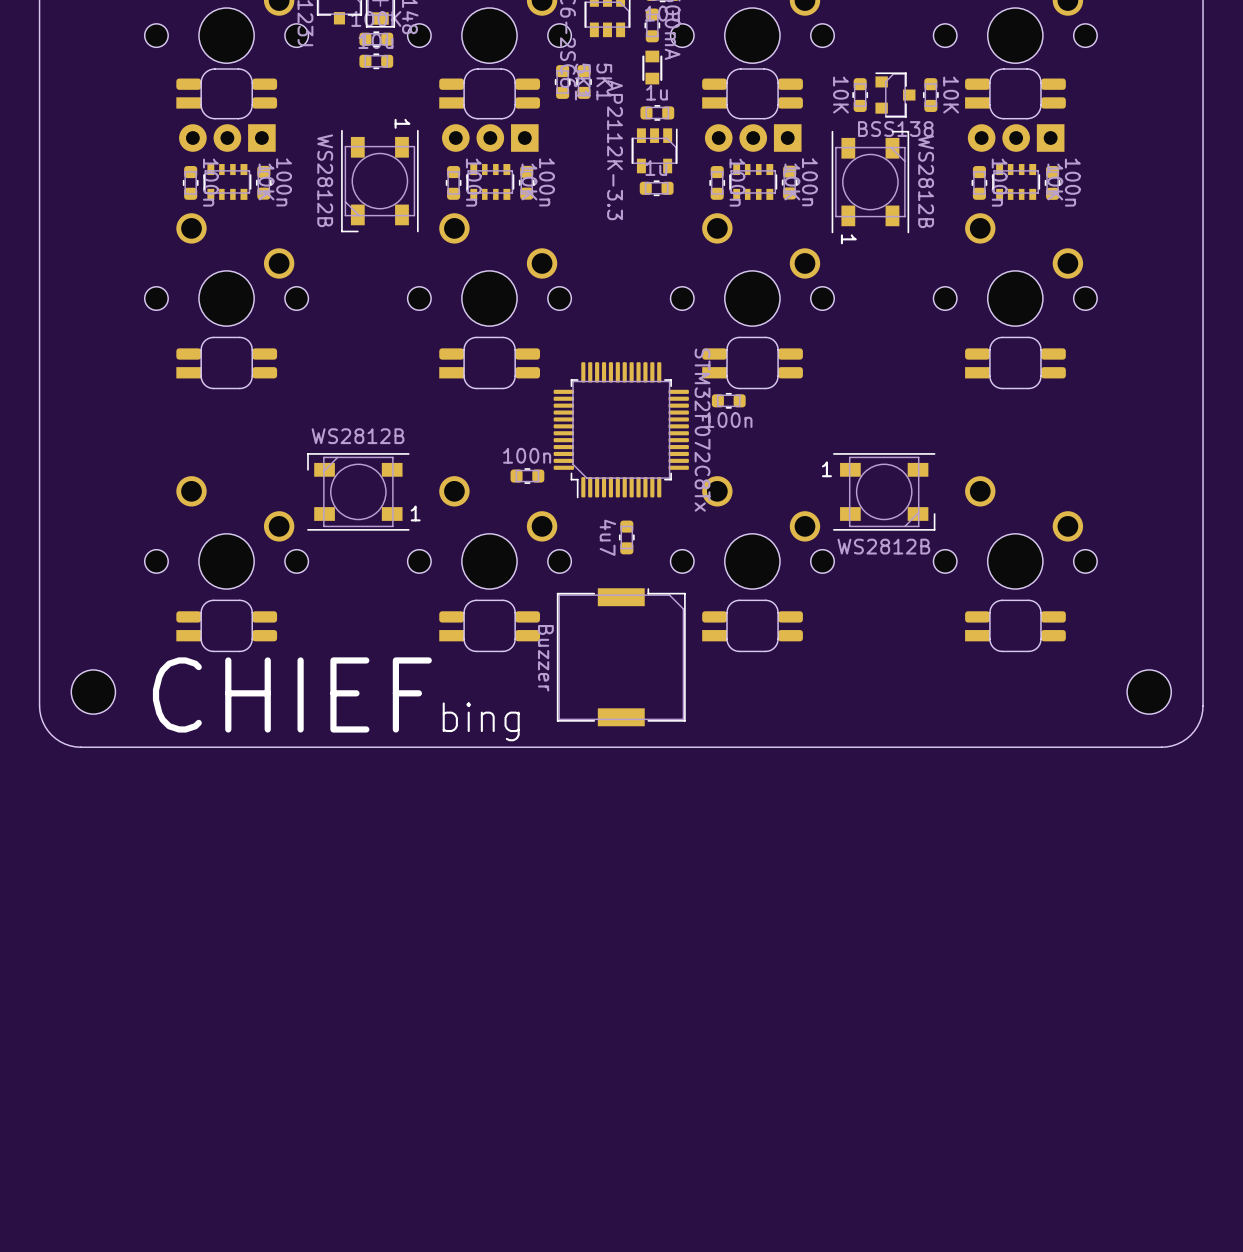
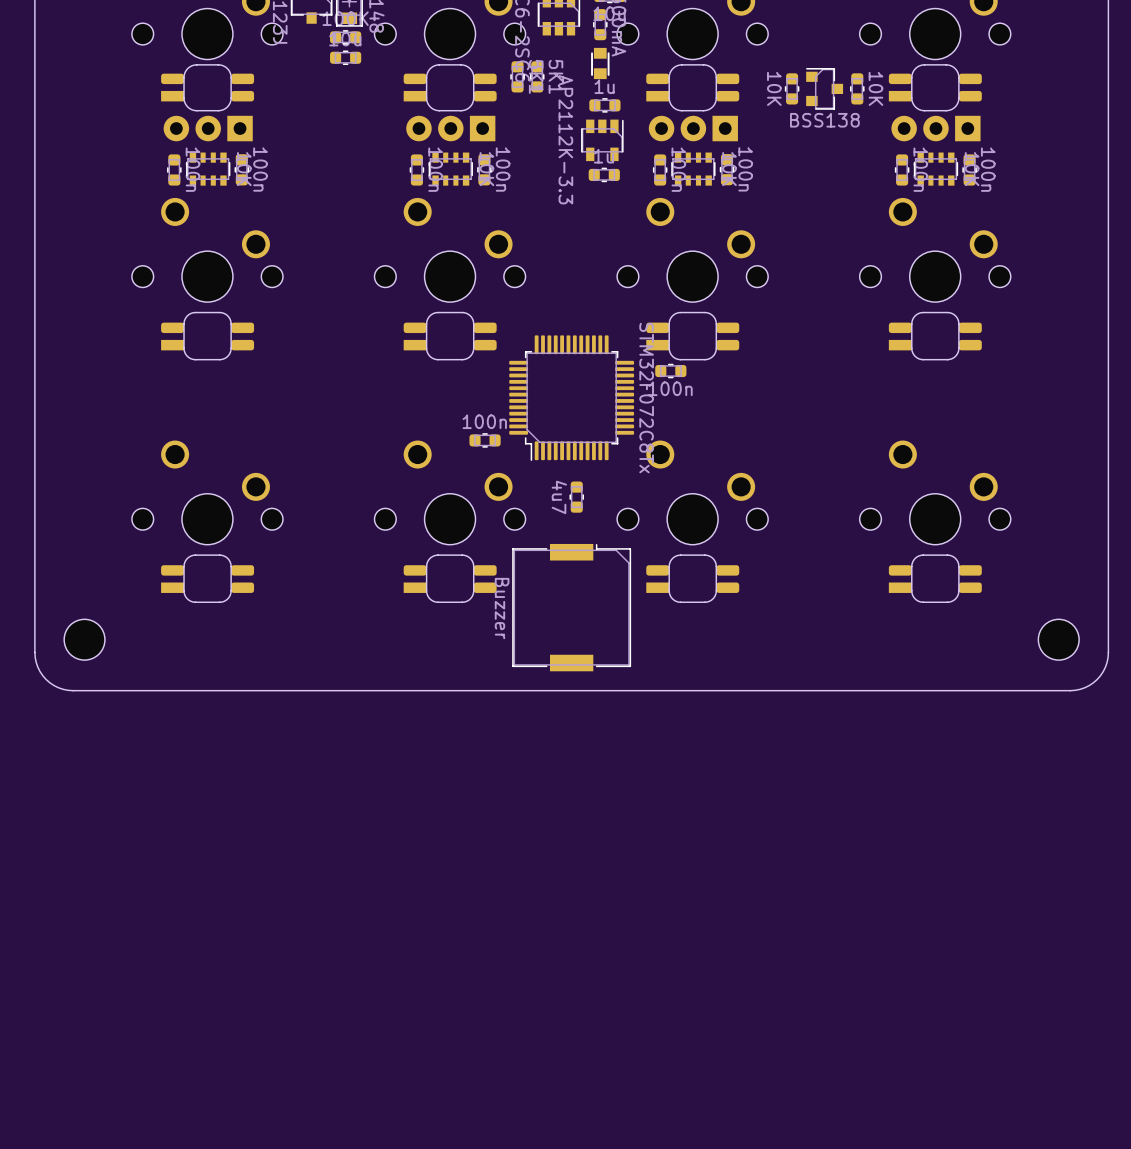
part: WS2812B (379, 181) -> none
part: WS2812B (870, 182) -> none
part: WS2812B (358, 491) -> none
part: WS2812B (884, 491) -> none
text: CHIEF (292, 694) -> none
text: bing (481, 721) -> none

